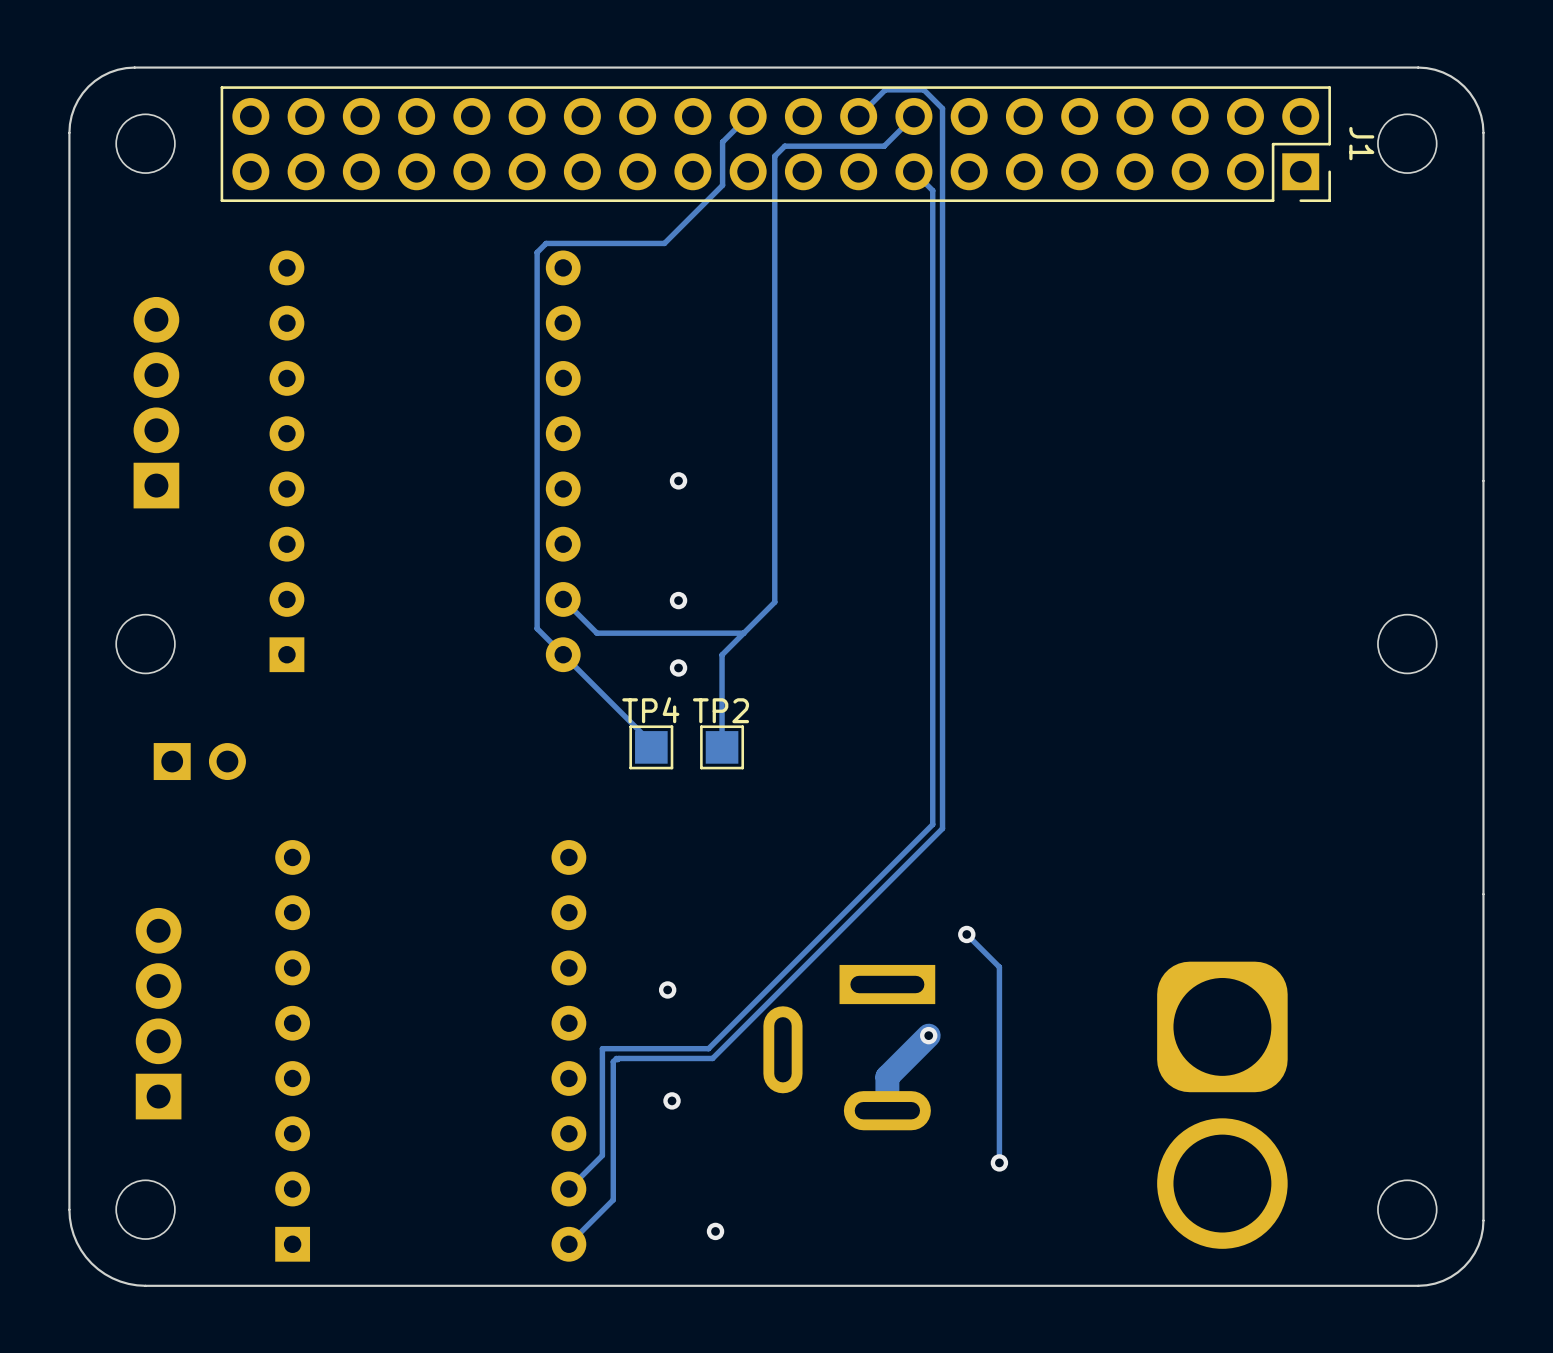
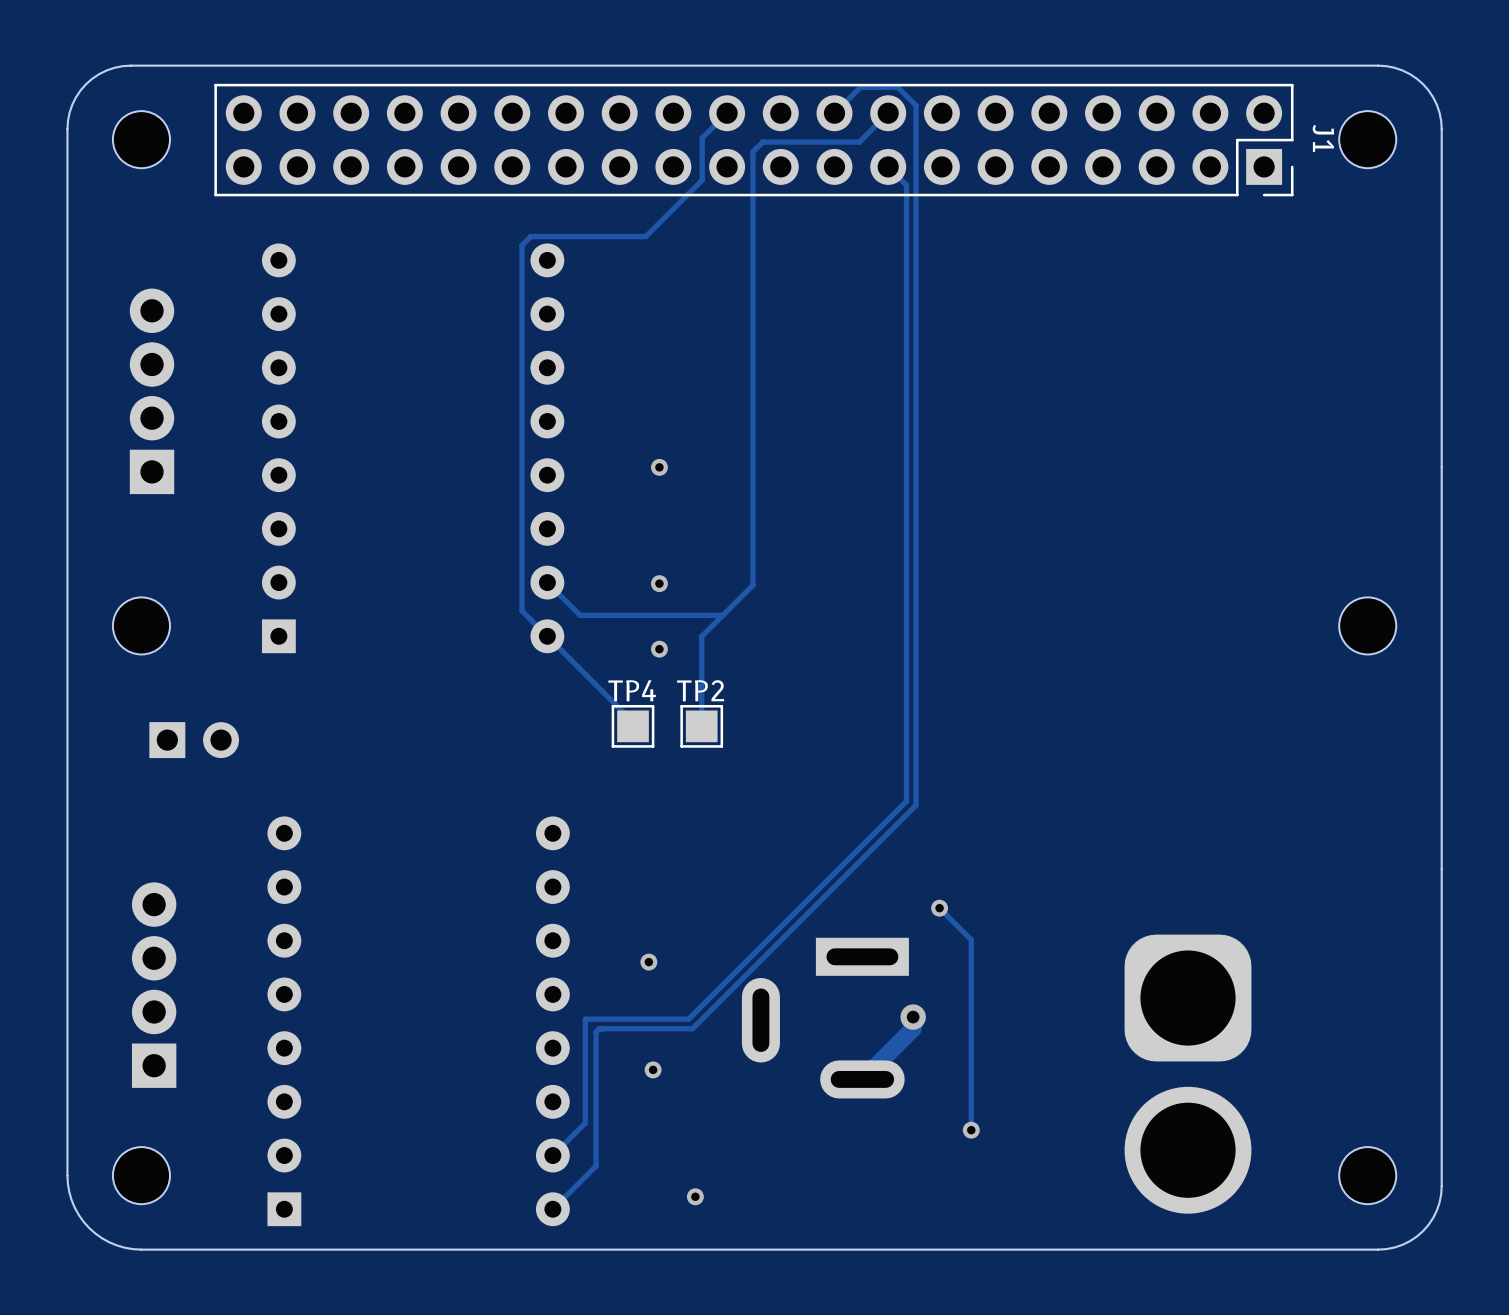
via size: [920, 1026, 938, 1045] -> [900, 1004, 926, 1030]
track: (928, 1035) (887, 1076) (887, 1110) -> (913, 1017) (913, 1028) (862, 1079)

